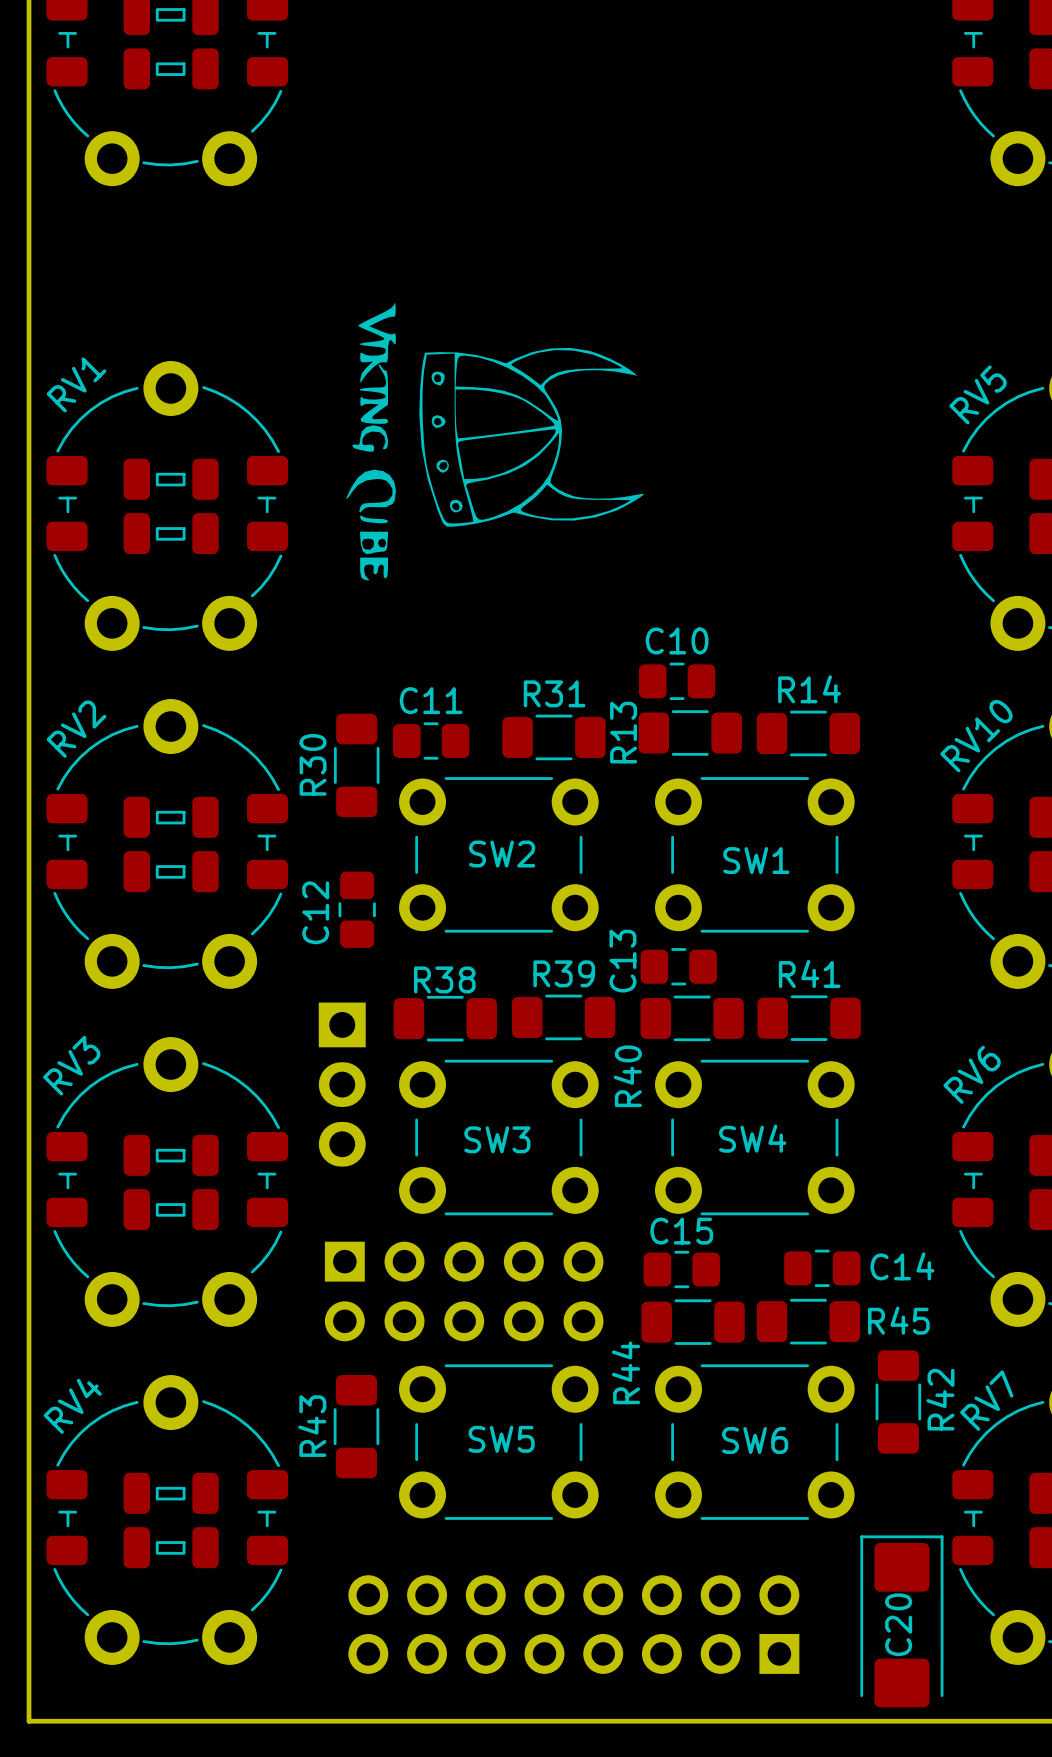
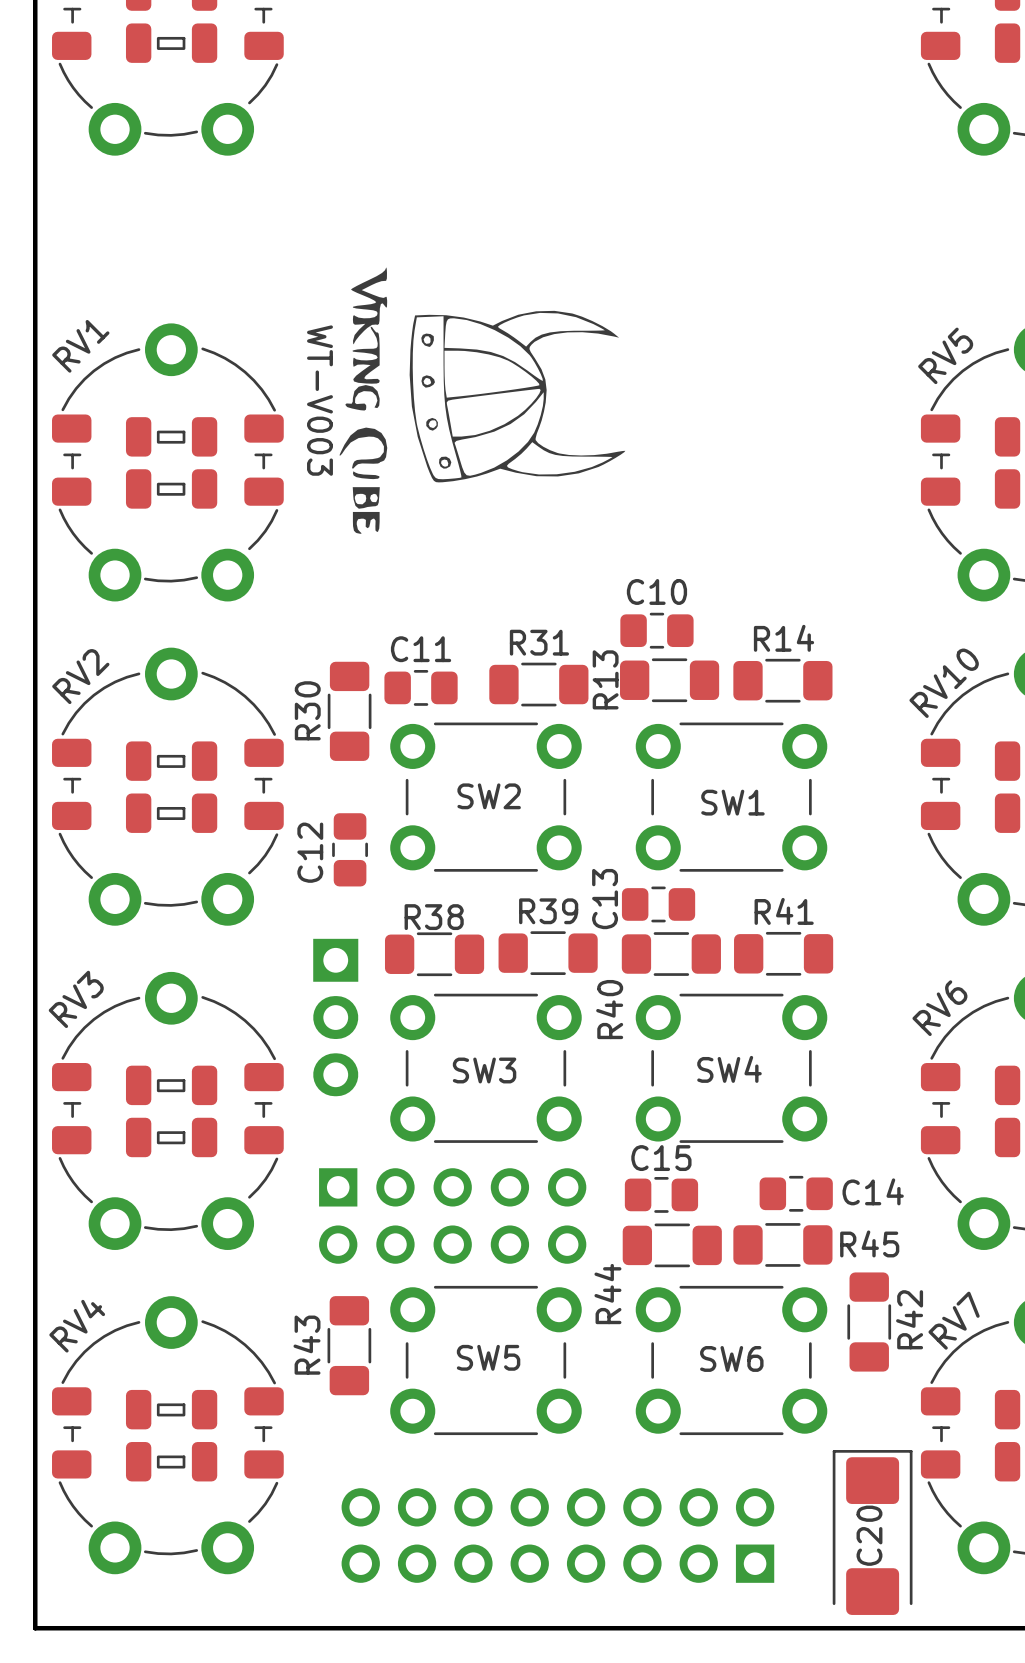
text: none -> WT-V003 (319, 400)

